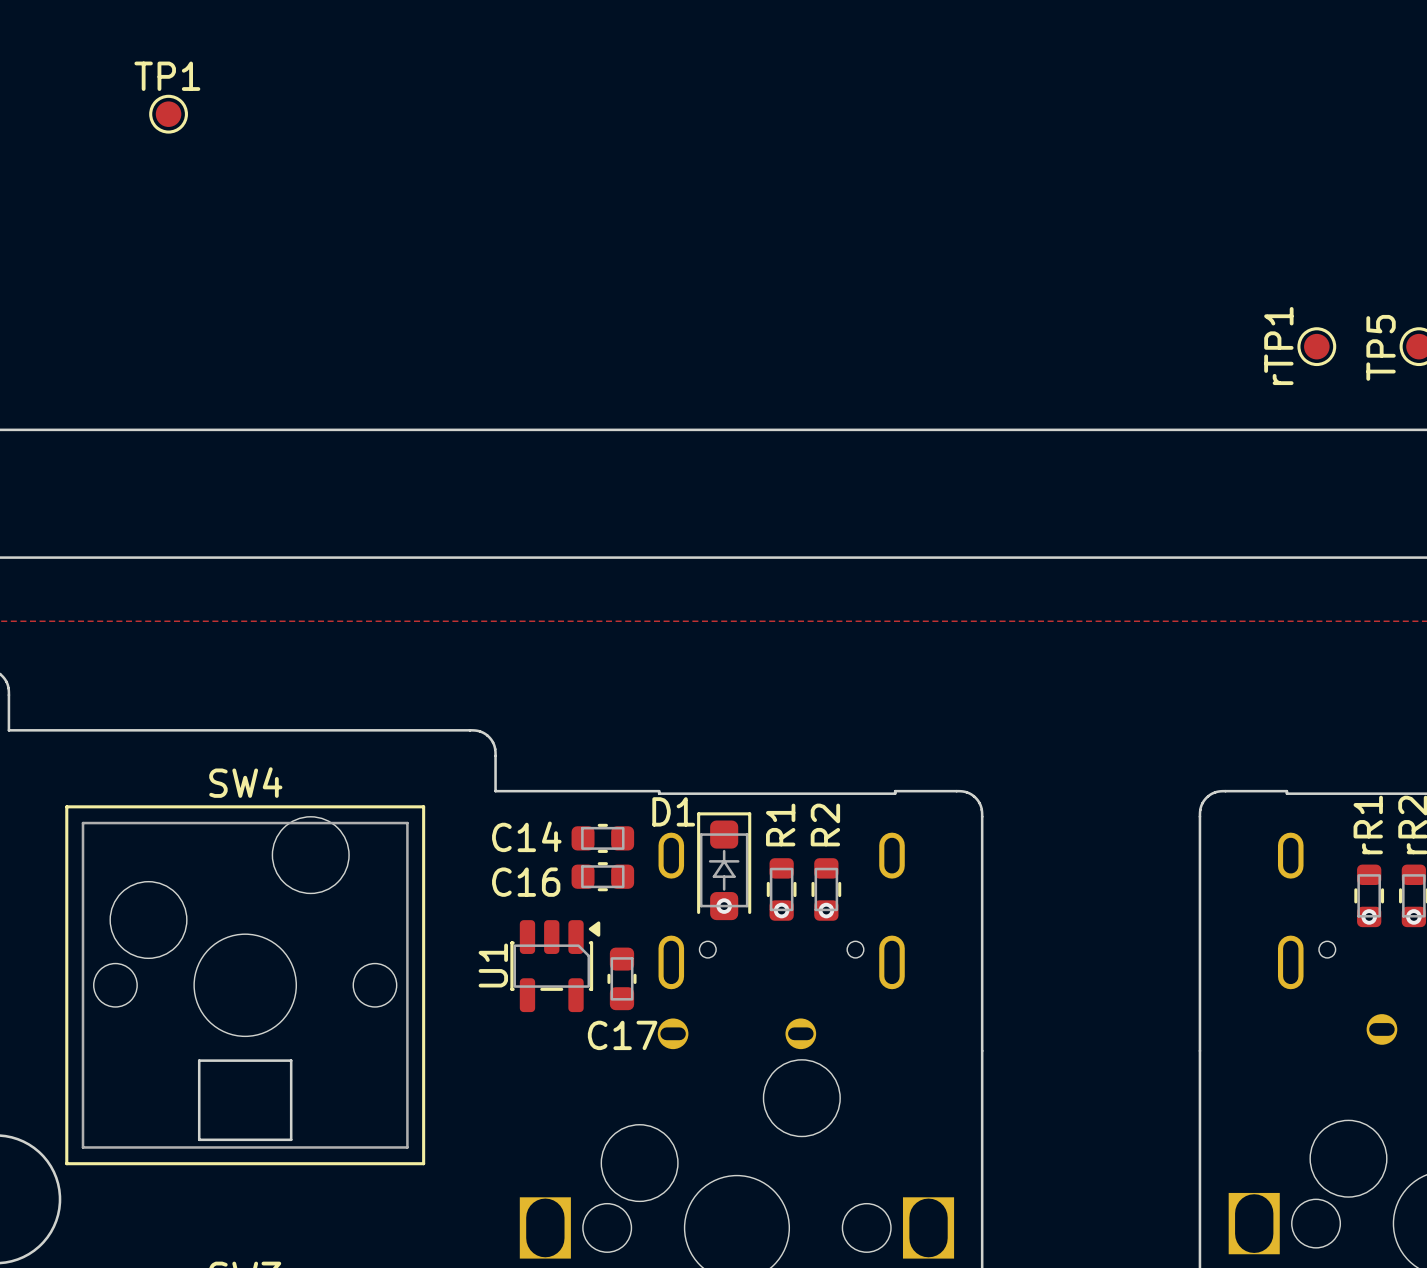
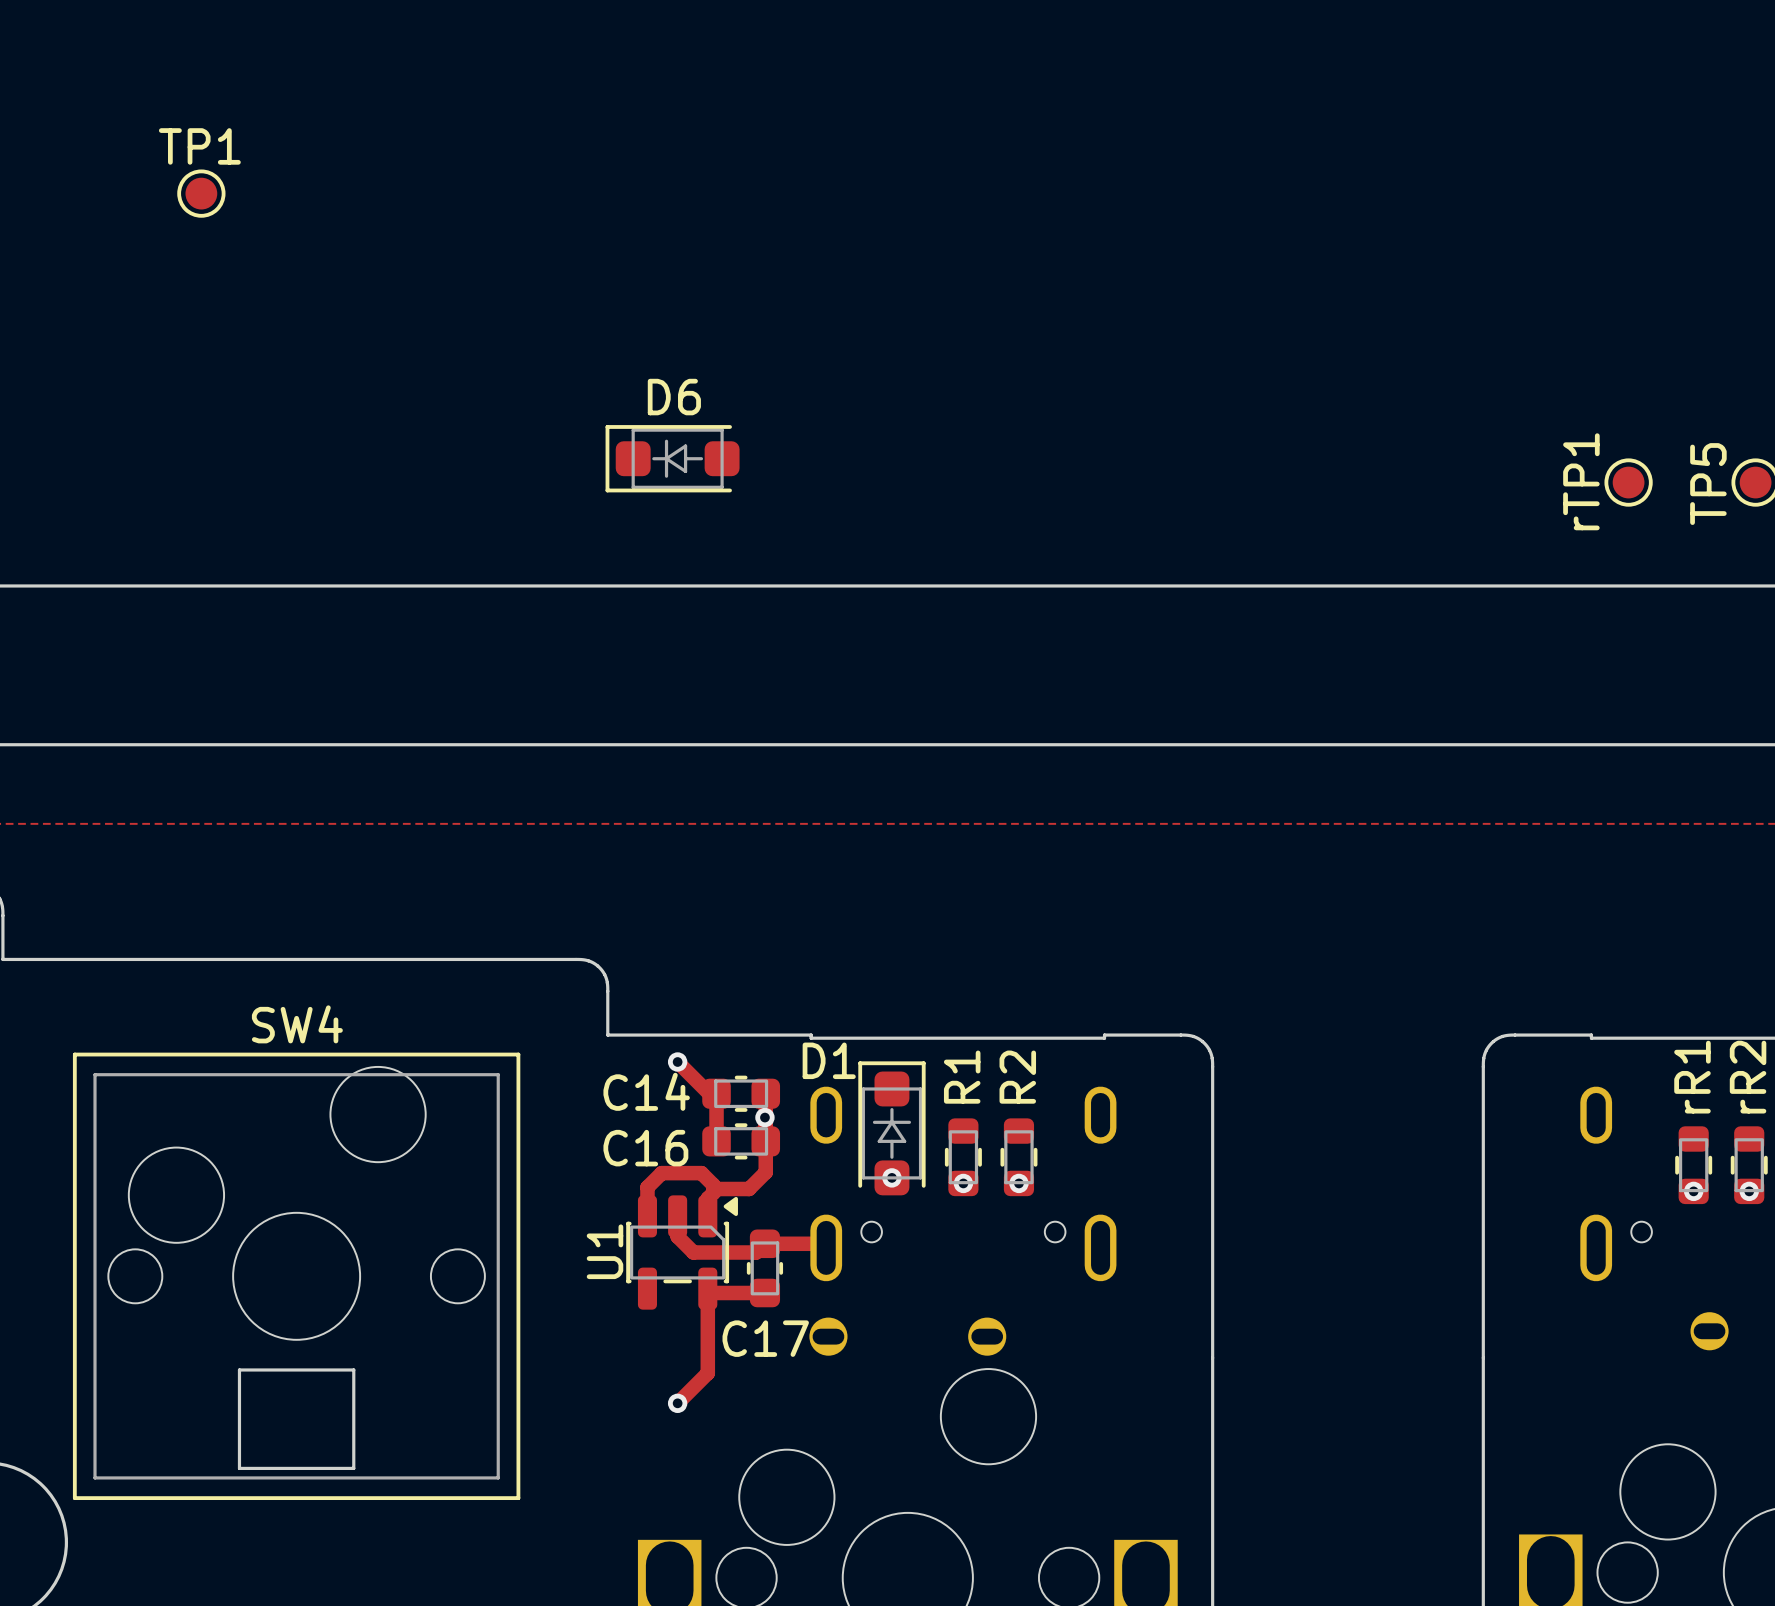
D6: none -> (672, 458)
track: none -> (677, 1062) (709, 1093) (716, 1093) (716, 1141)
via: none -> (677, 1062)
track: none -> (765, 1093) (765, 1172) (749, 1189) (717, 1189) (707, 1198) (707, 1216)
via: none -> (764, 1117)
track: none -> (713, 1192) (713, 1185) (701, 1173) (661, 1173) (647, 1187) (647, 1216)
track: none -> (677, 1216) (677, 1236) (693, 1252) (756, 1252) (764, 1243) (822, 1243) (826, 1247)
track: none -> (764, 1292) (712, 1292) (707, 1288) (707, 1373) (677, 1403)
via: none -> (677, 1403)

